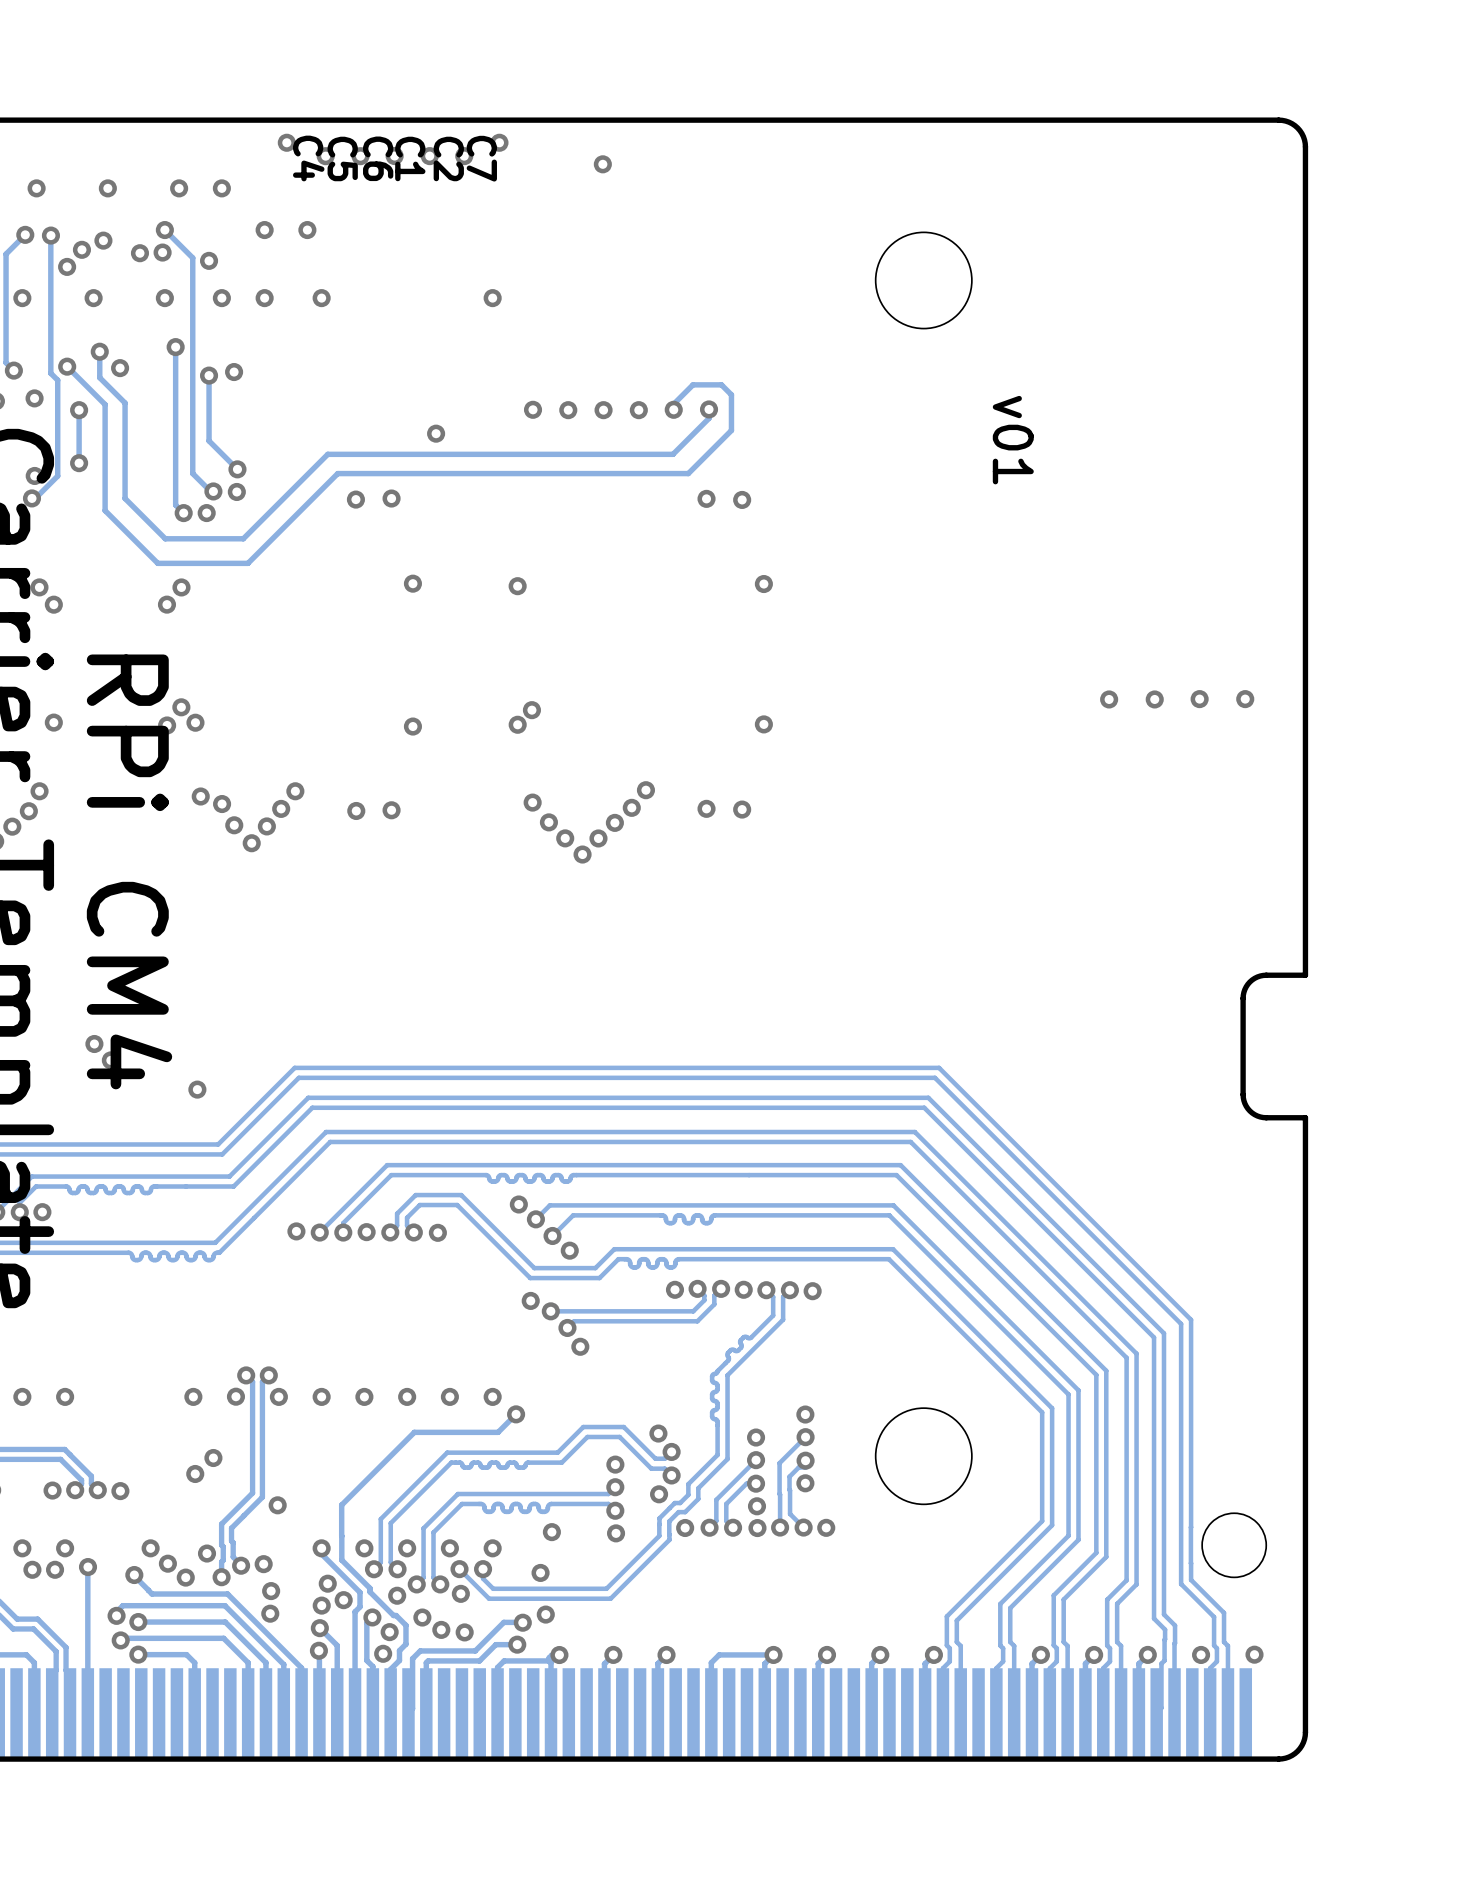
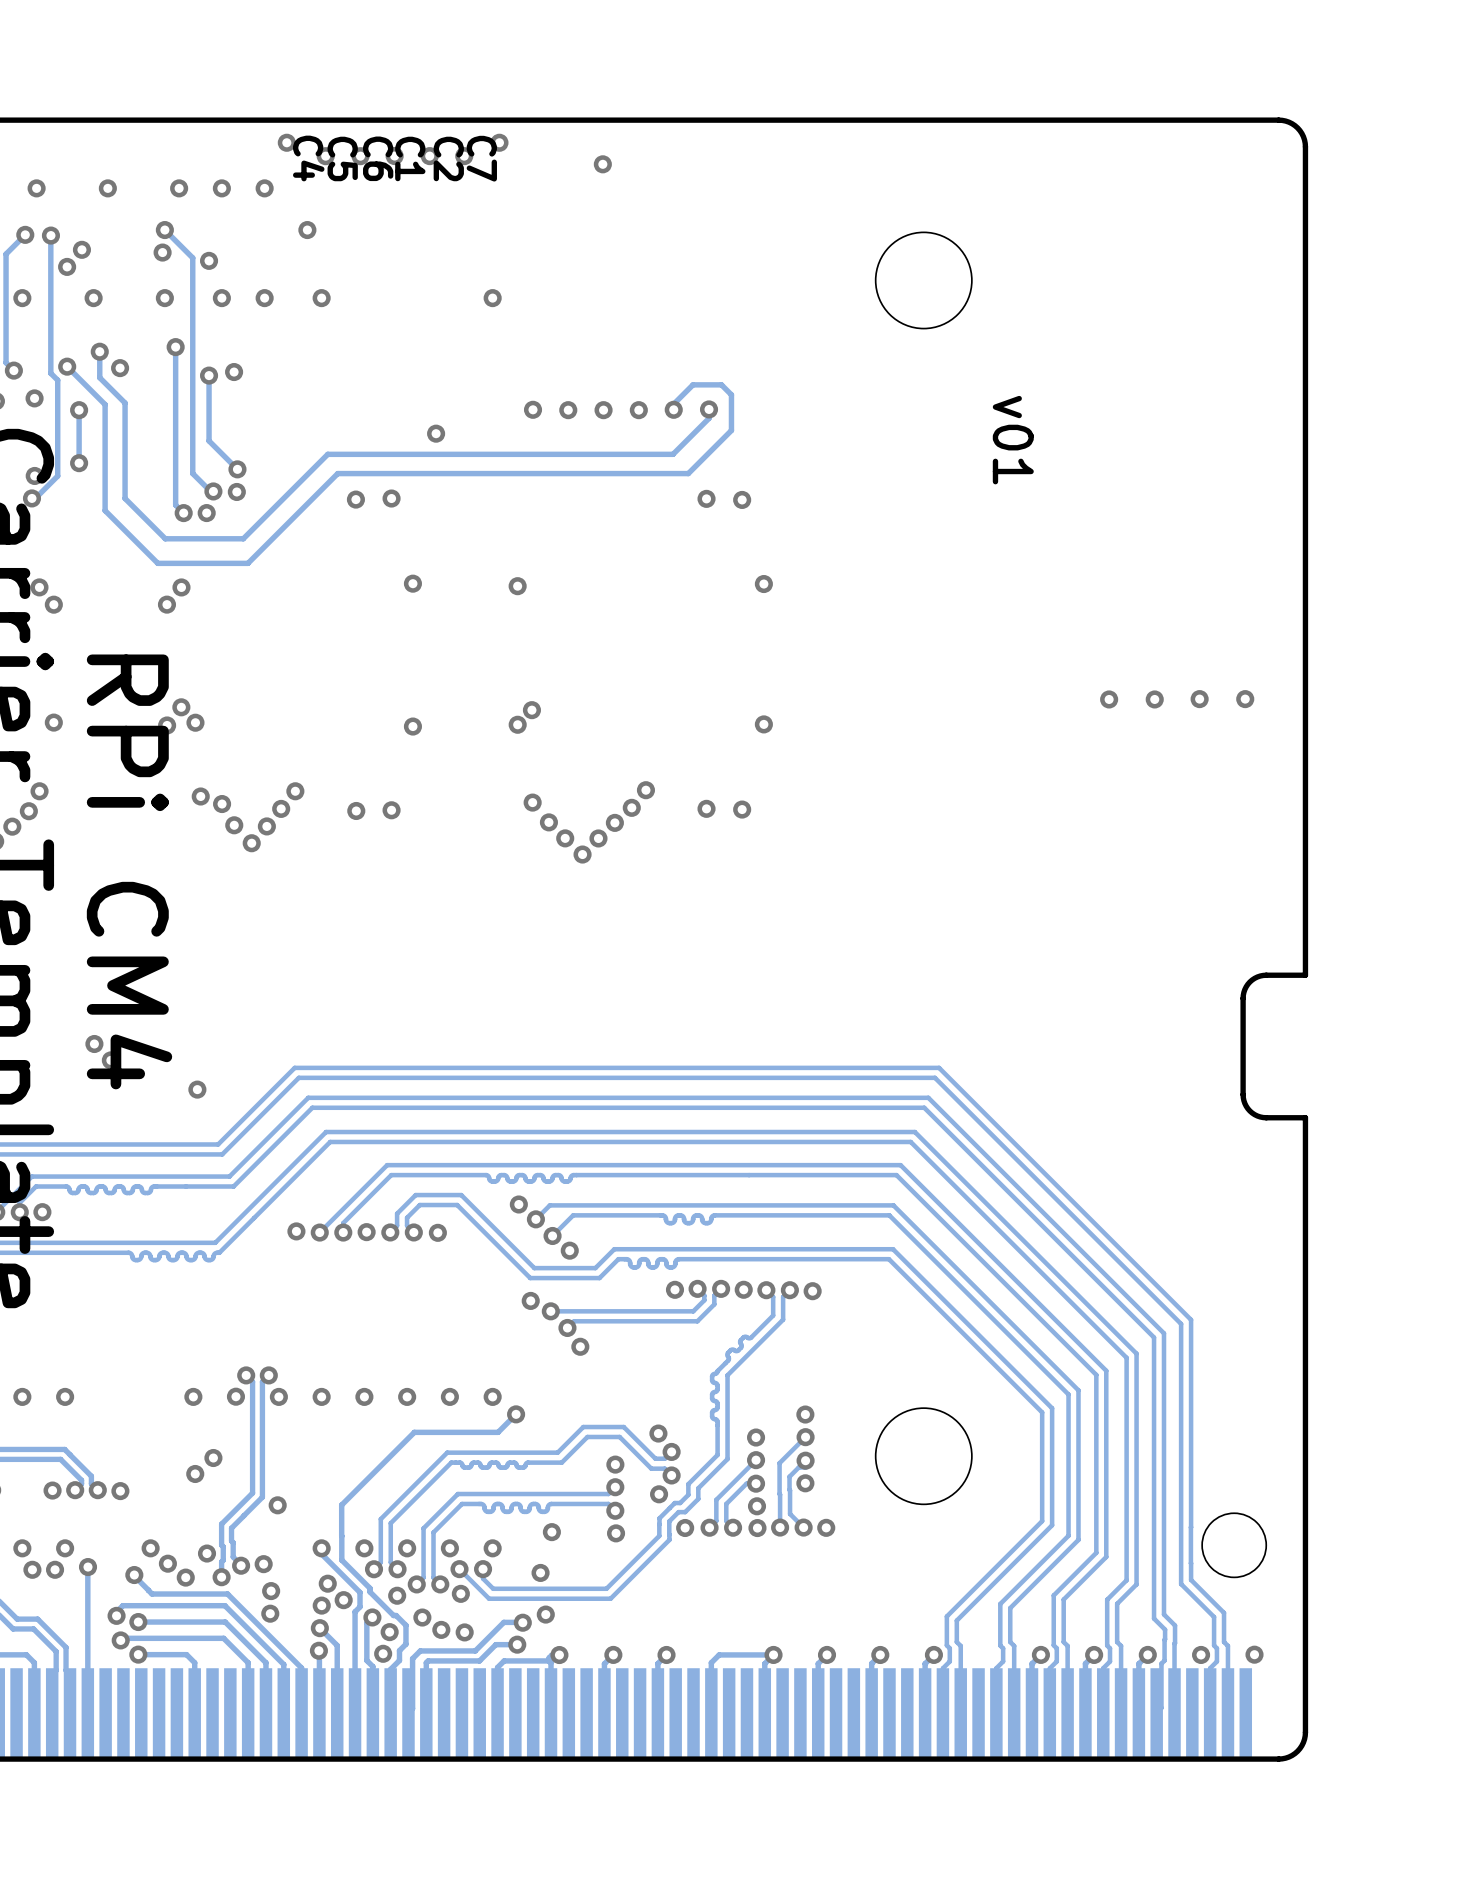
via position: (264, 230) -> (264, 188)
via: (103, 240) -> none
via: (139, 253) -> none

